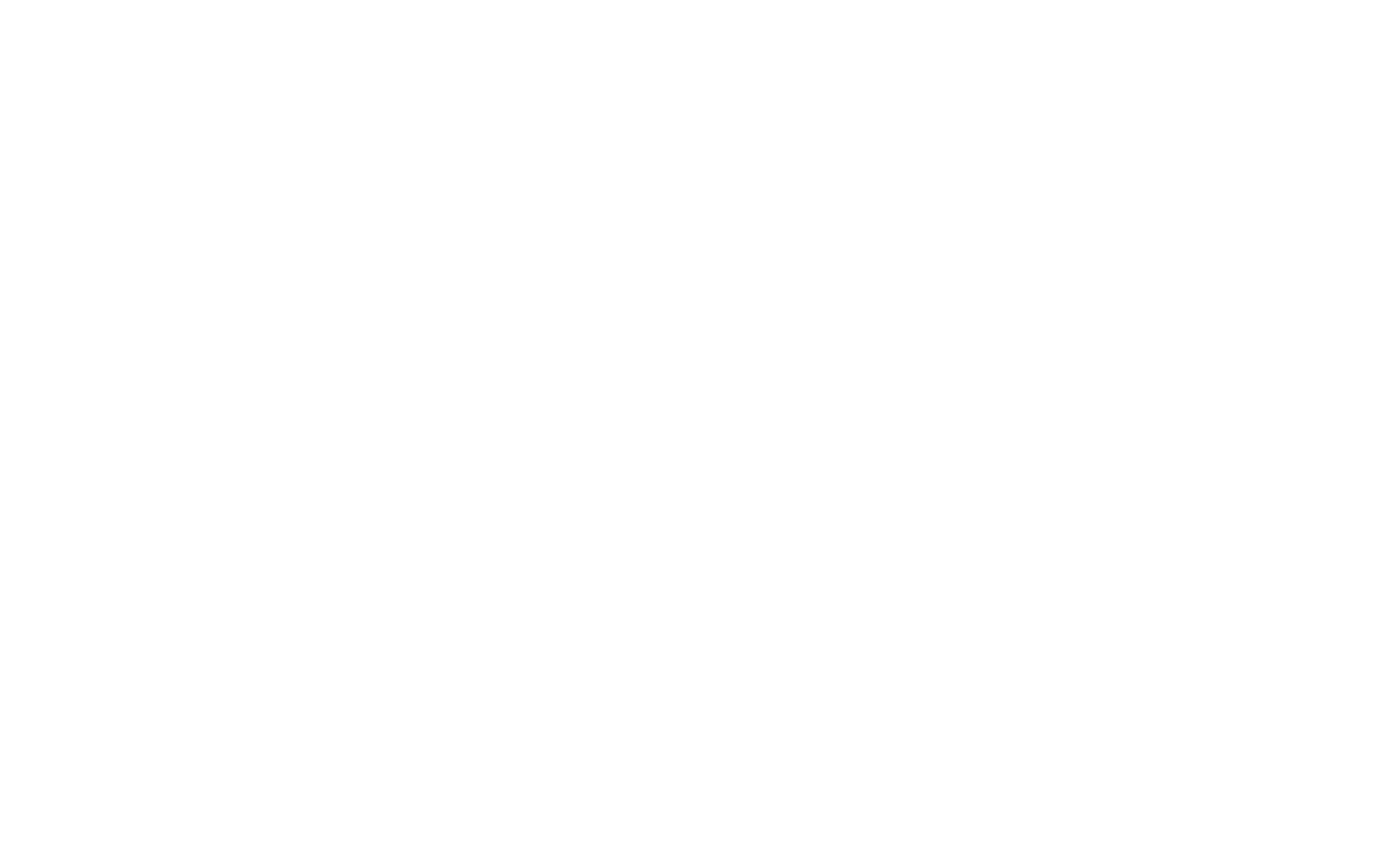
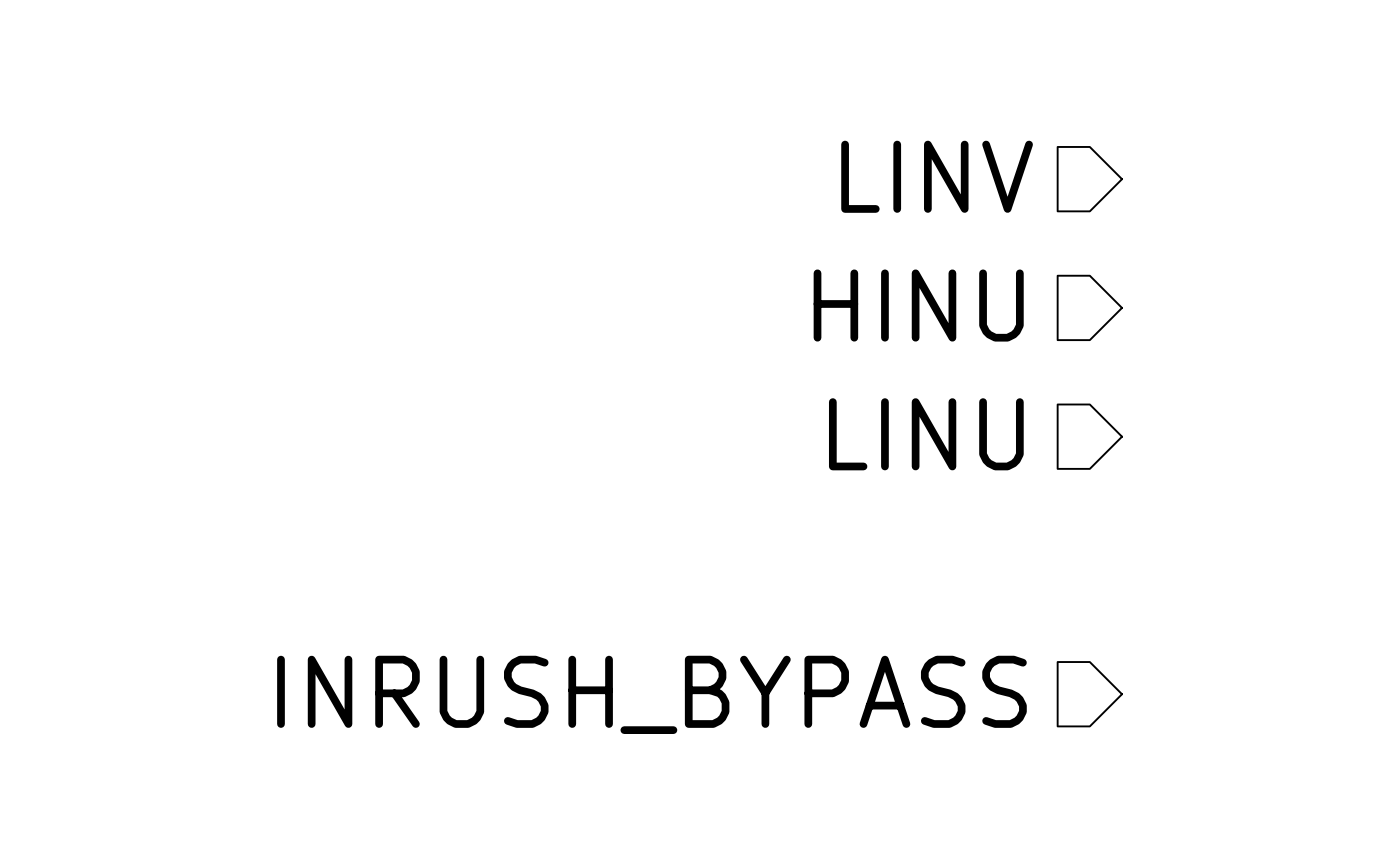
hierarchical label: none -> LINV (937, 176)
hierarchical label: none -> HINU (918, 305)
hierarchical label: none -> LINU (926, 434)
hierarchical label: none -> INRUSH_BYPASS (651, 694)

